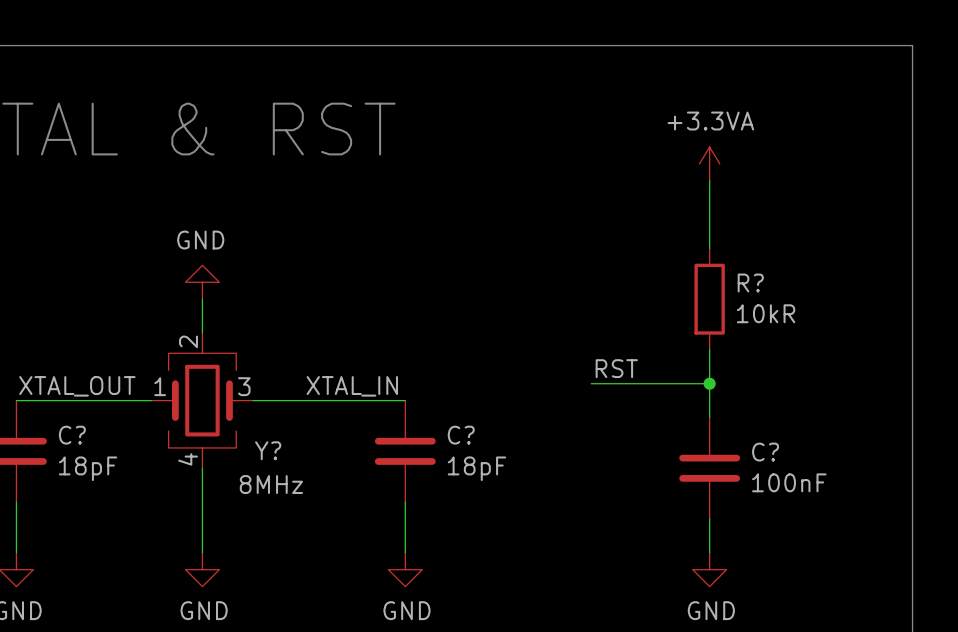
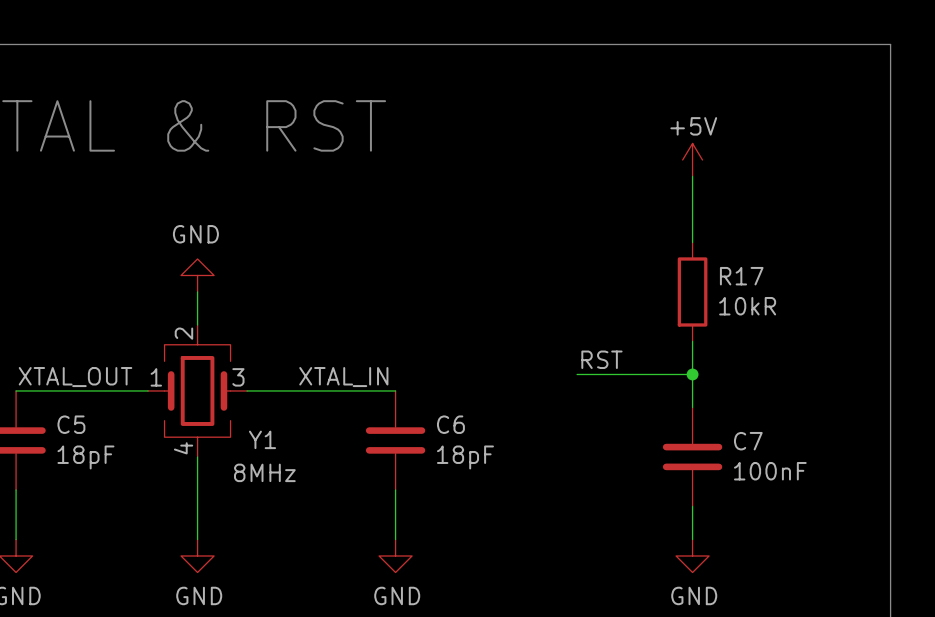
power symbol: +3.3VA (709, 163) -> +5V (692, 159)
R? name: R? (750, 282) -> R17 (741, 276)
C? name: C? (72, 435) -> C5 (71, 424)
C? name: C? (461, 435) -> C6 (450, 424)
Y? name: Y? (268, 450) -> Y1 (262, 439)
C? name: C? (765, 452) -> C7 (748, 441)

